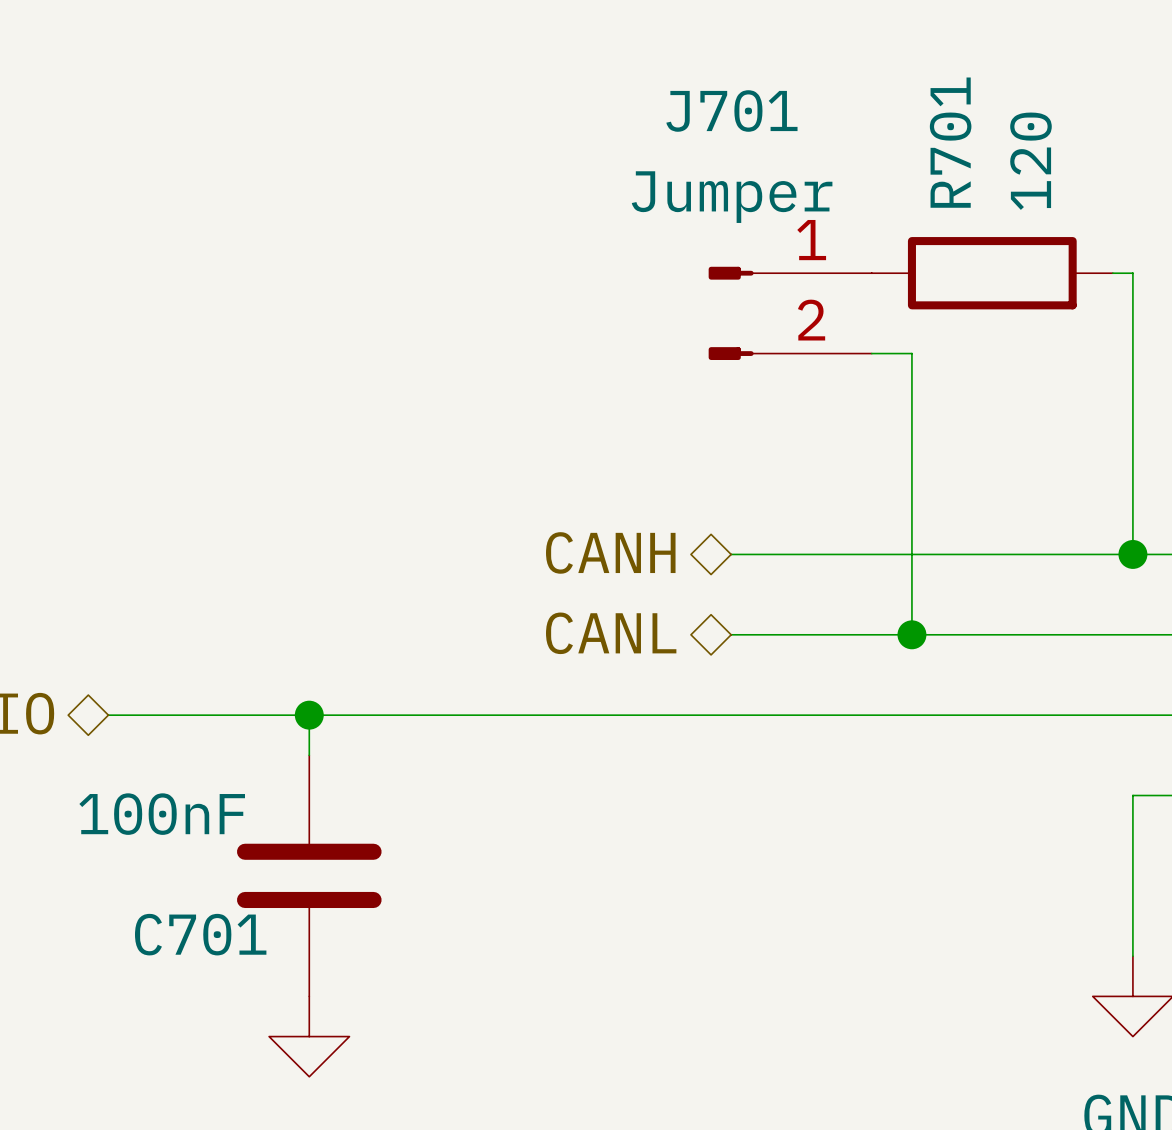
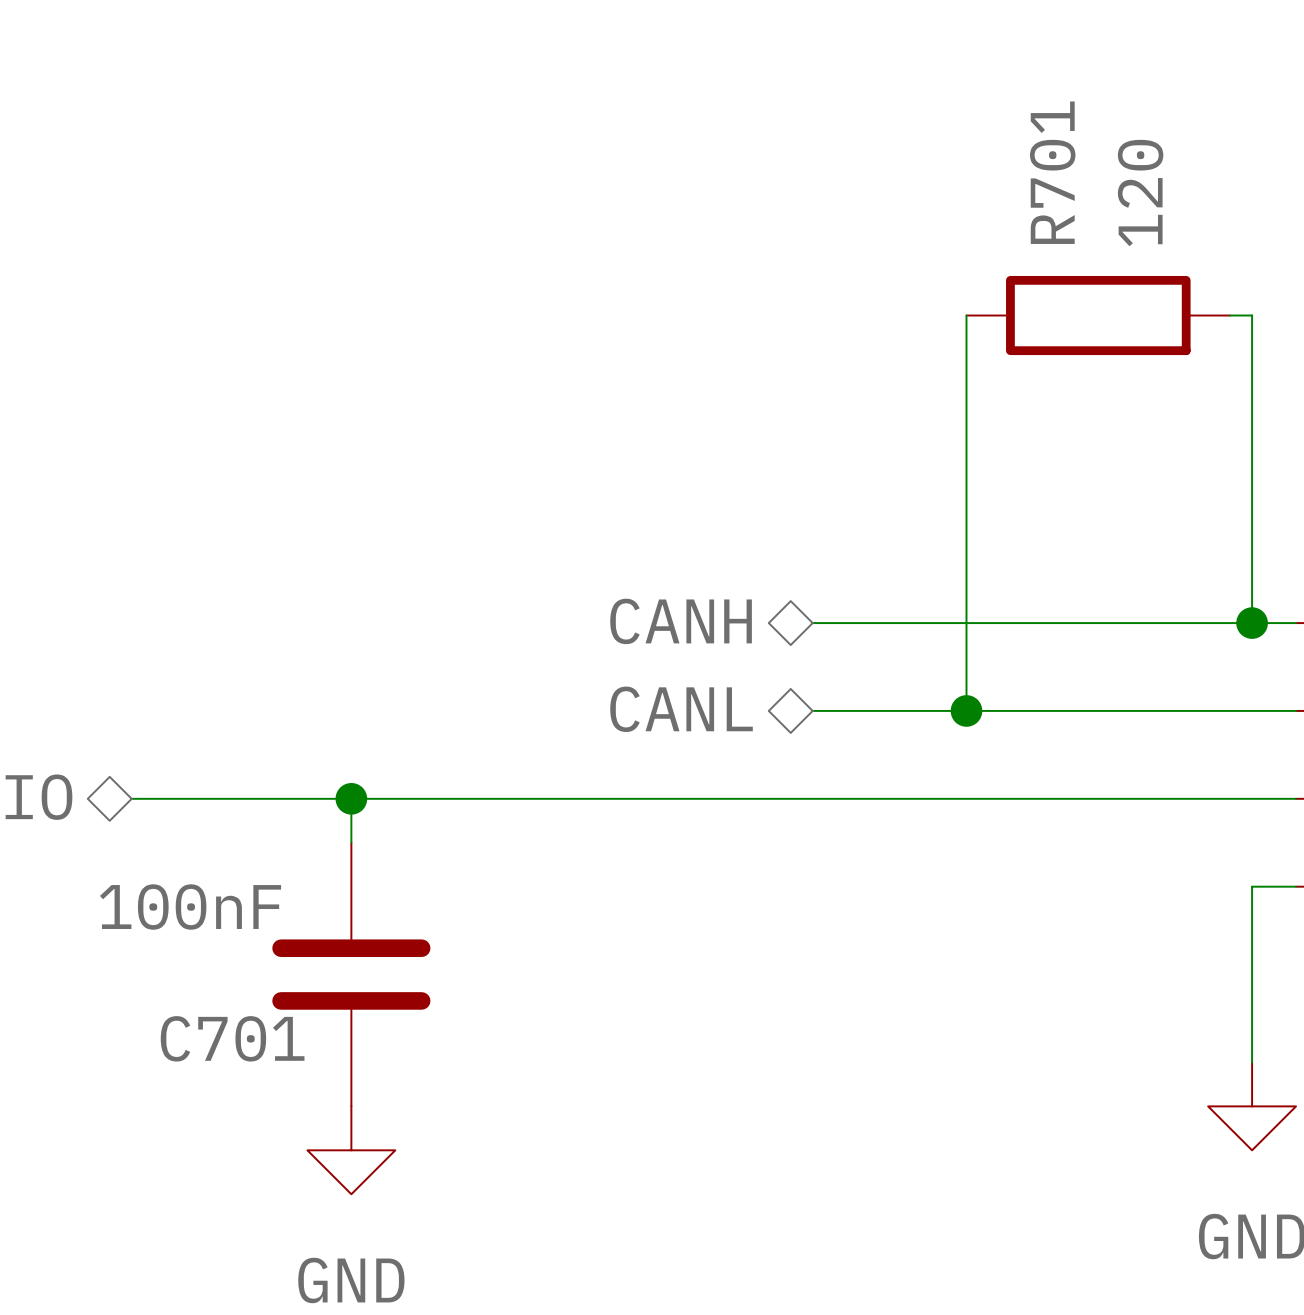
wire: none -> (966, 315) (966, 710)
J701: Jumper (790, 313) -> none
wire: (871, 353) (911, 353) (911, 634) -> none
junction position: (911, 634) -> (966, 710)

